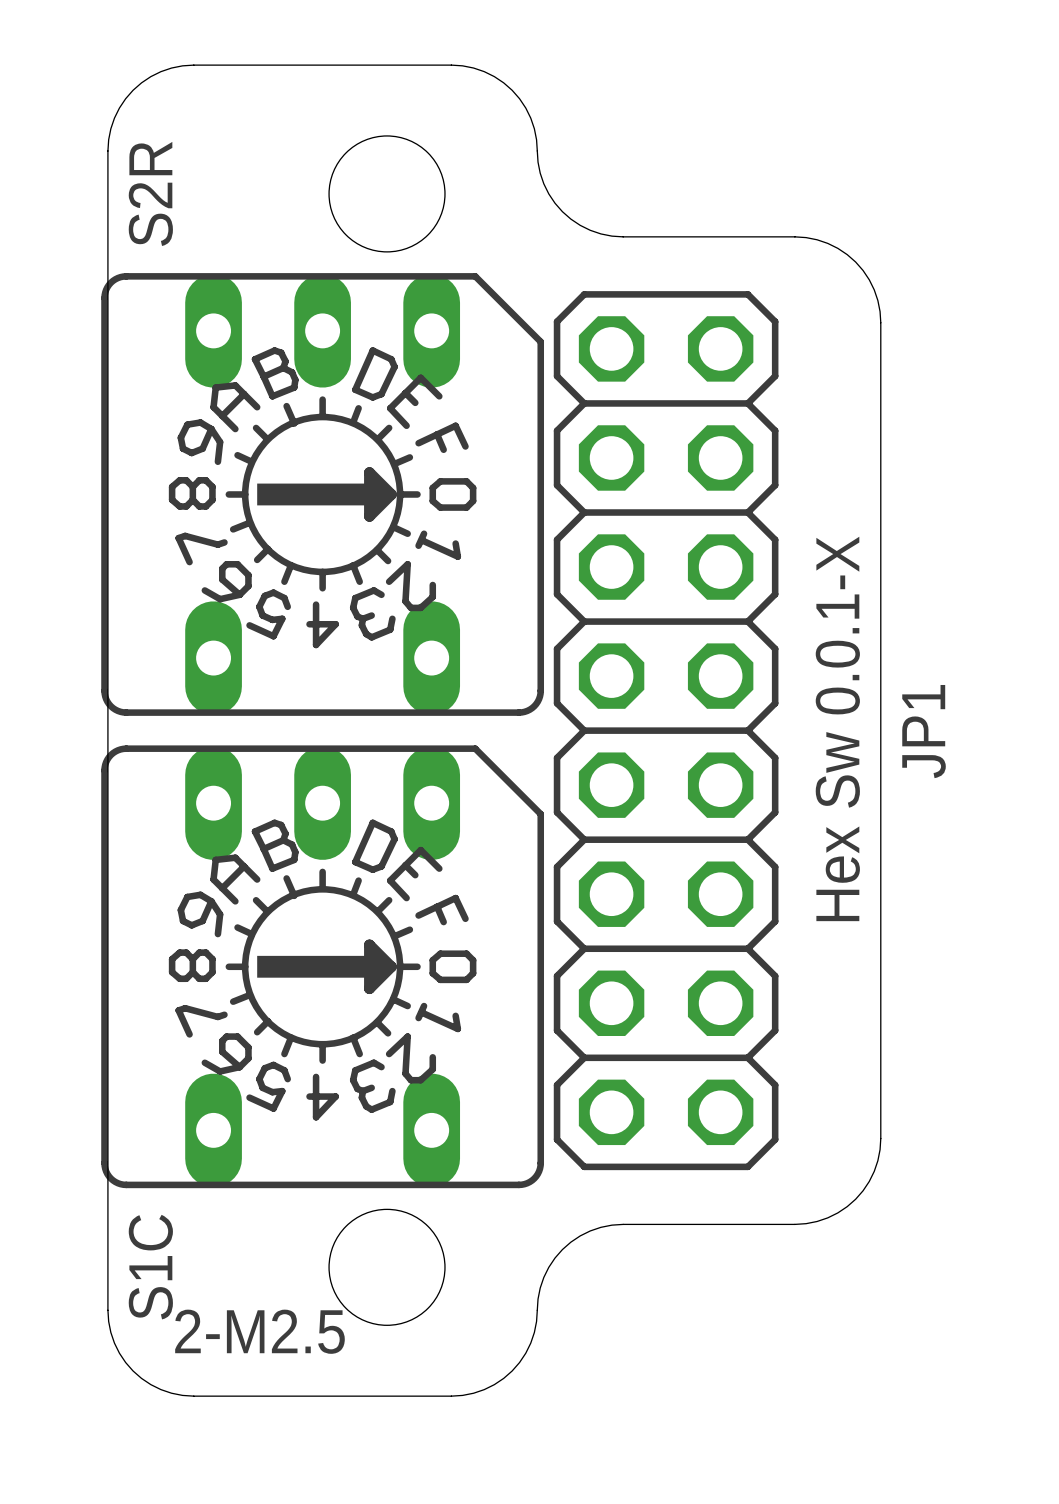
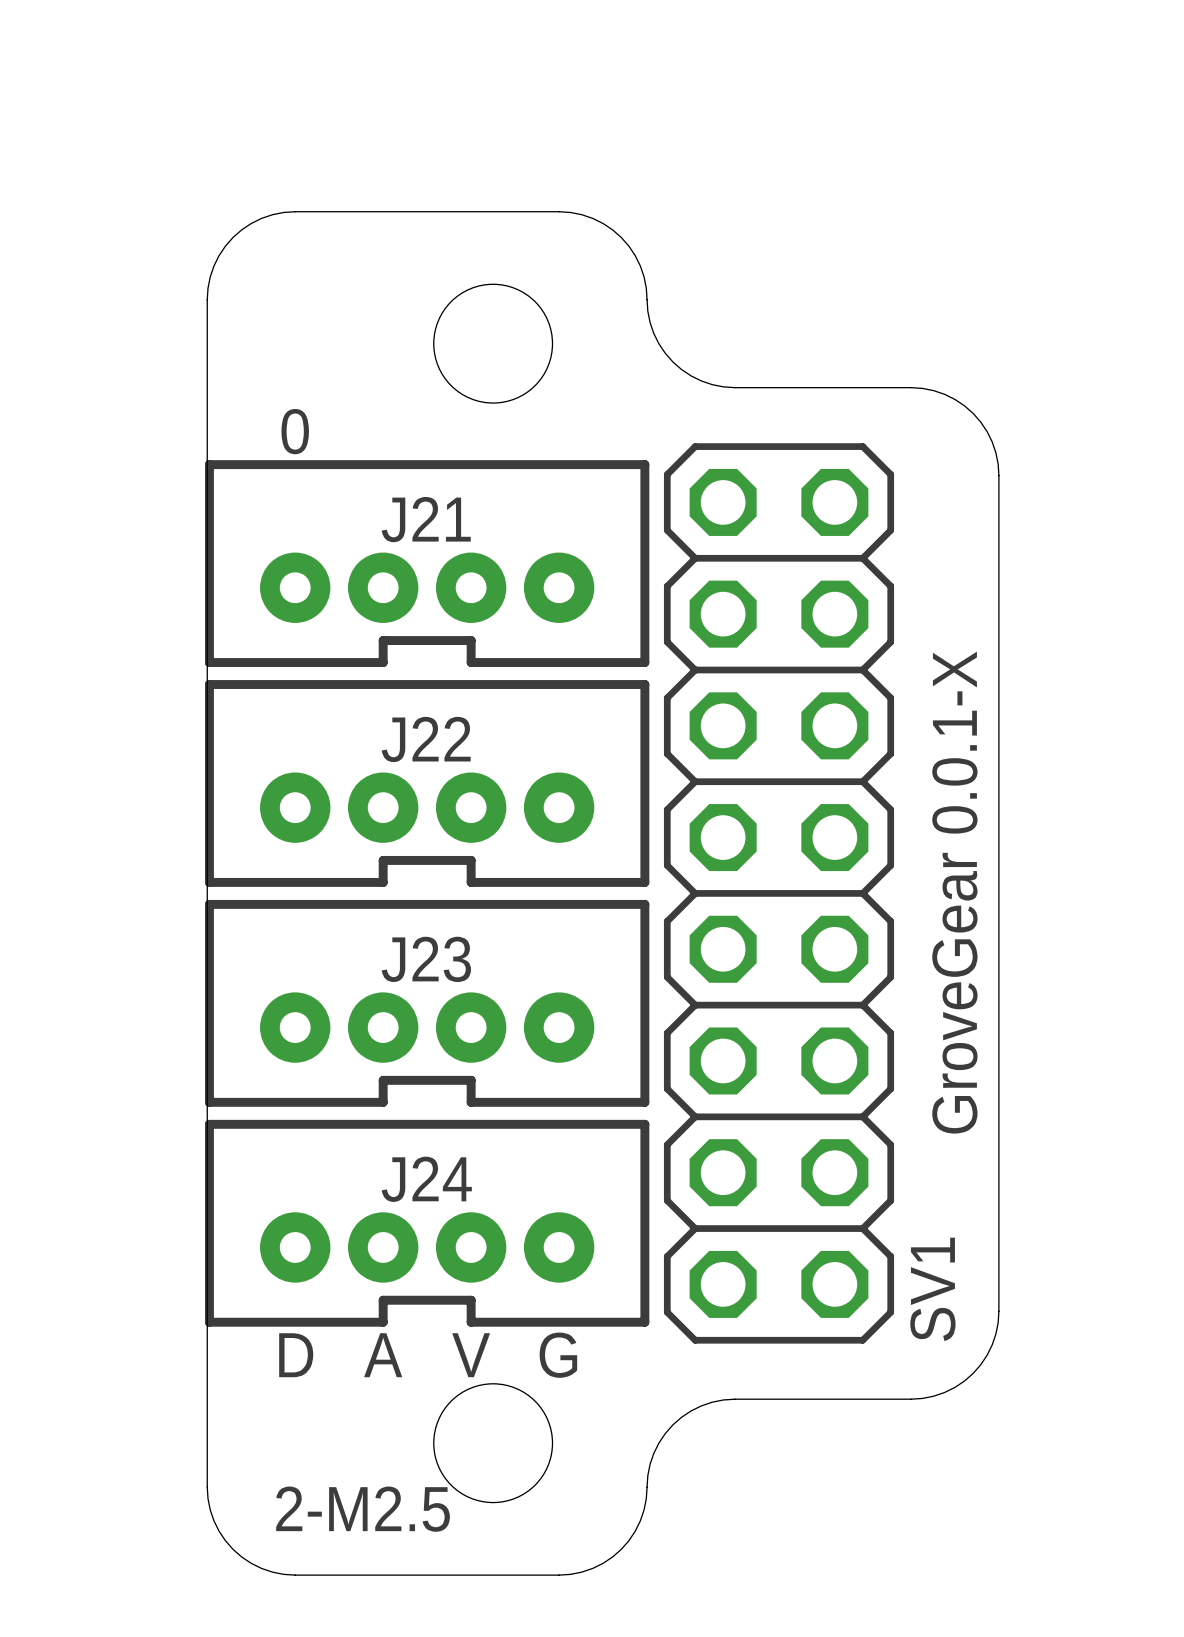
text: none -> 0 (295, 431)
J21: none -> (427, 563)
S2R: (322, 494) -> none
J22: none -> (427, 783)
text: Hex Sw 0.0.1-X (837, 728) -> GroveGear 0.0.1-X (954, 892)
JP1 name: JP1 (924, 731) -> SV1 (932, 1289)
J23: none -> (427, 1003)
S1C: (322, 966) -> none
J24: none -> (427, 1223)
text: none -> D (296, 1355)
text: none -> A (383, 1355)
text: none -> V (471, 1355)
text: none -> G (558, 1355)

